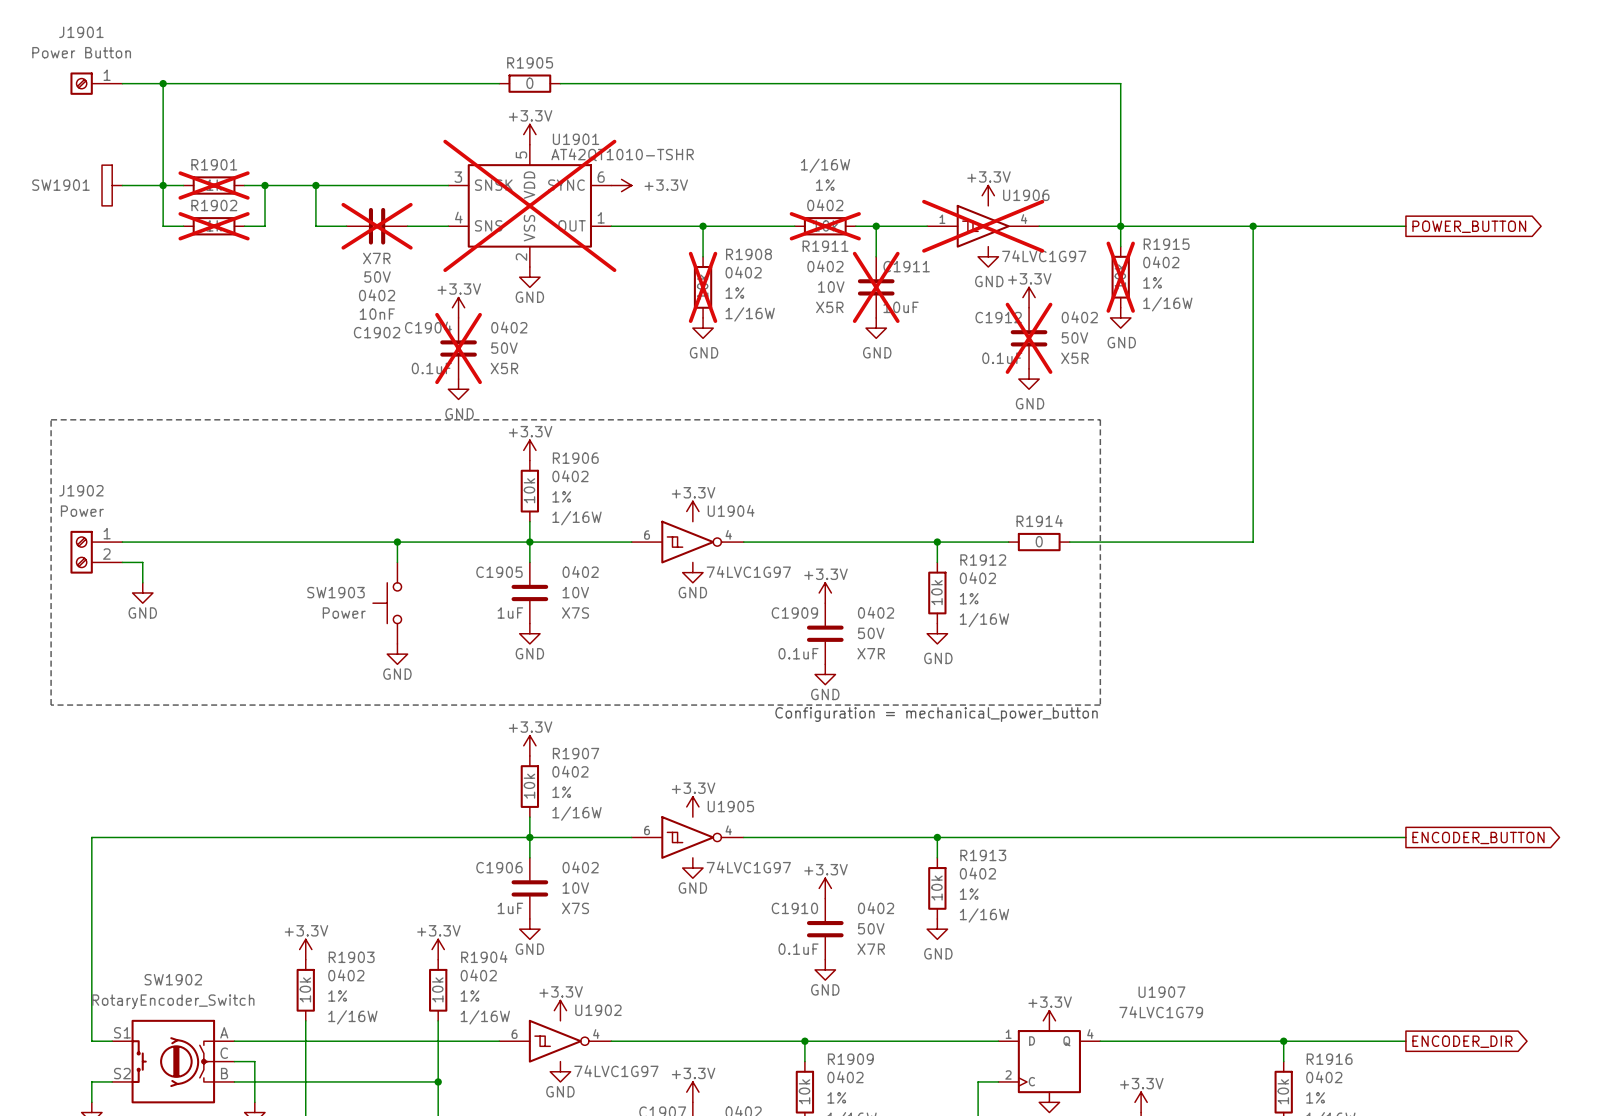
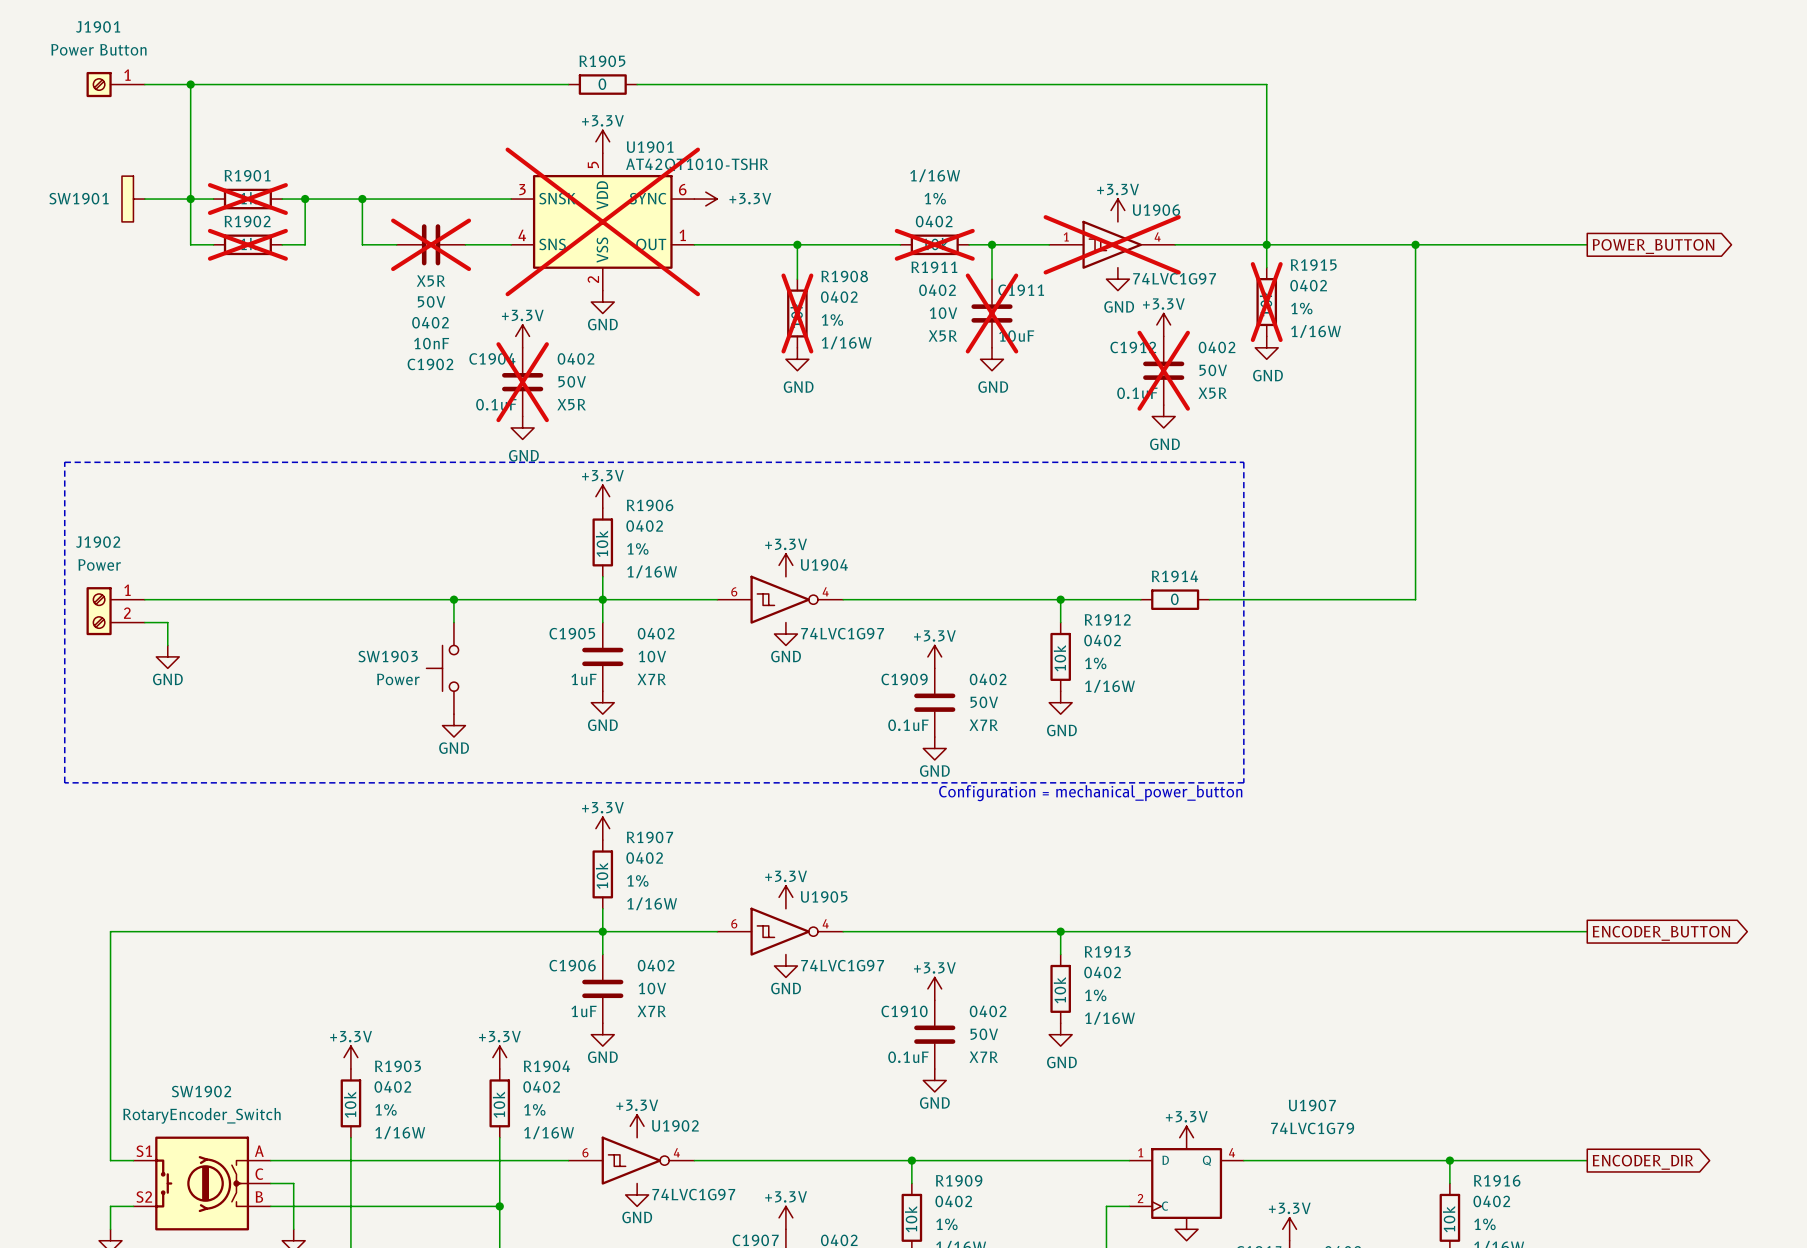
C1902 text: X7R (376, 258) -> X5R (431, 281)
C1905 text: X7S (575, 612) -> X7R (651, 679)
C1906 text: X7S (575, 908) -> X7R (651, 1011)

